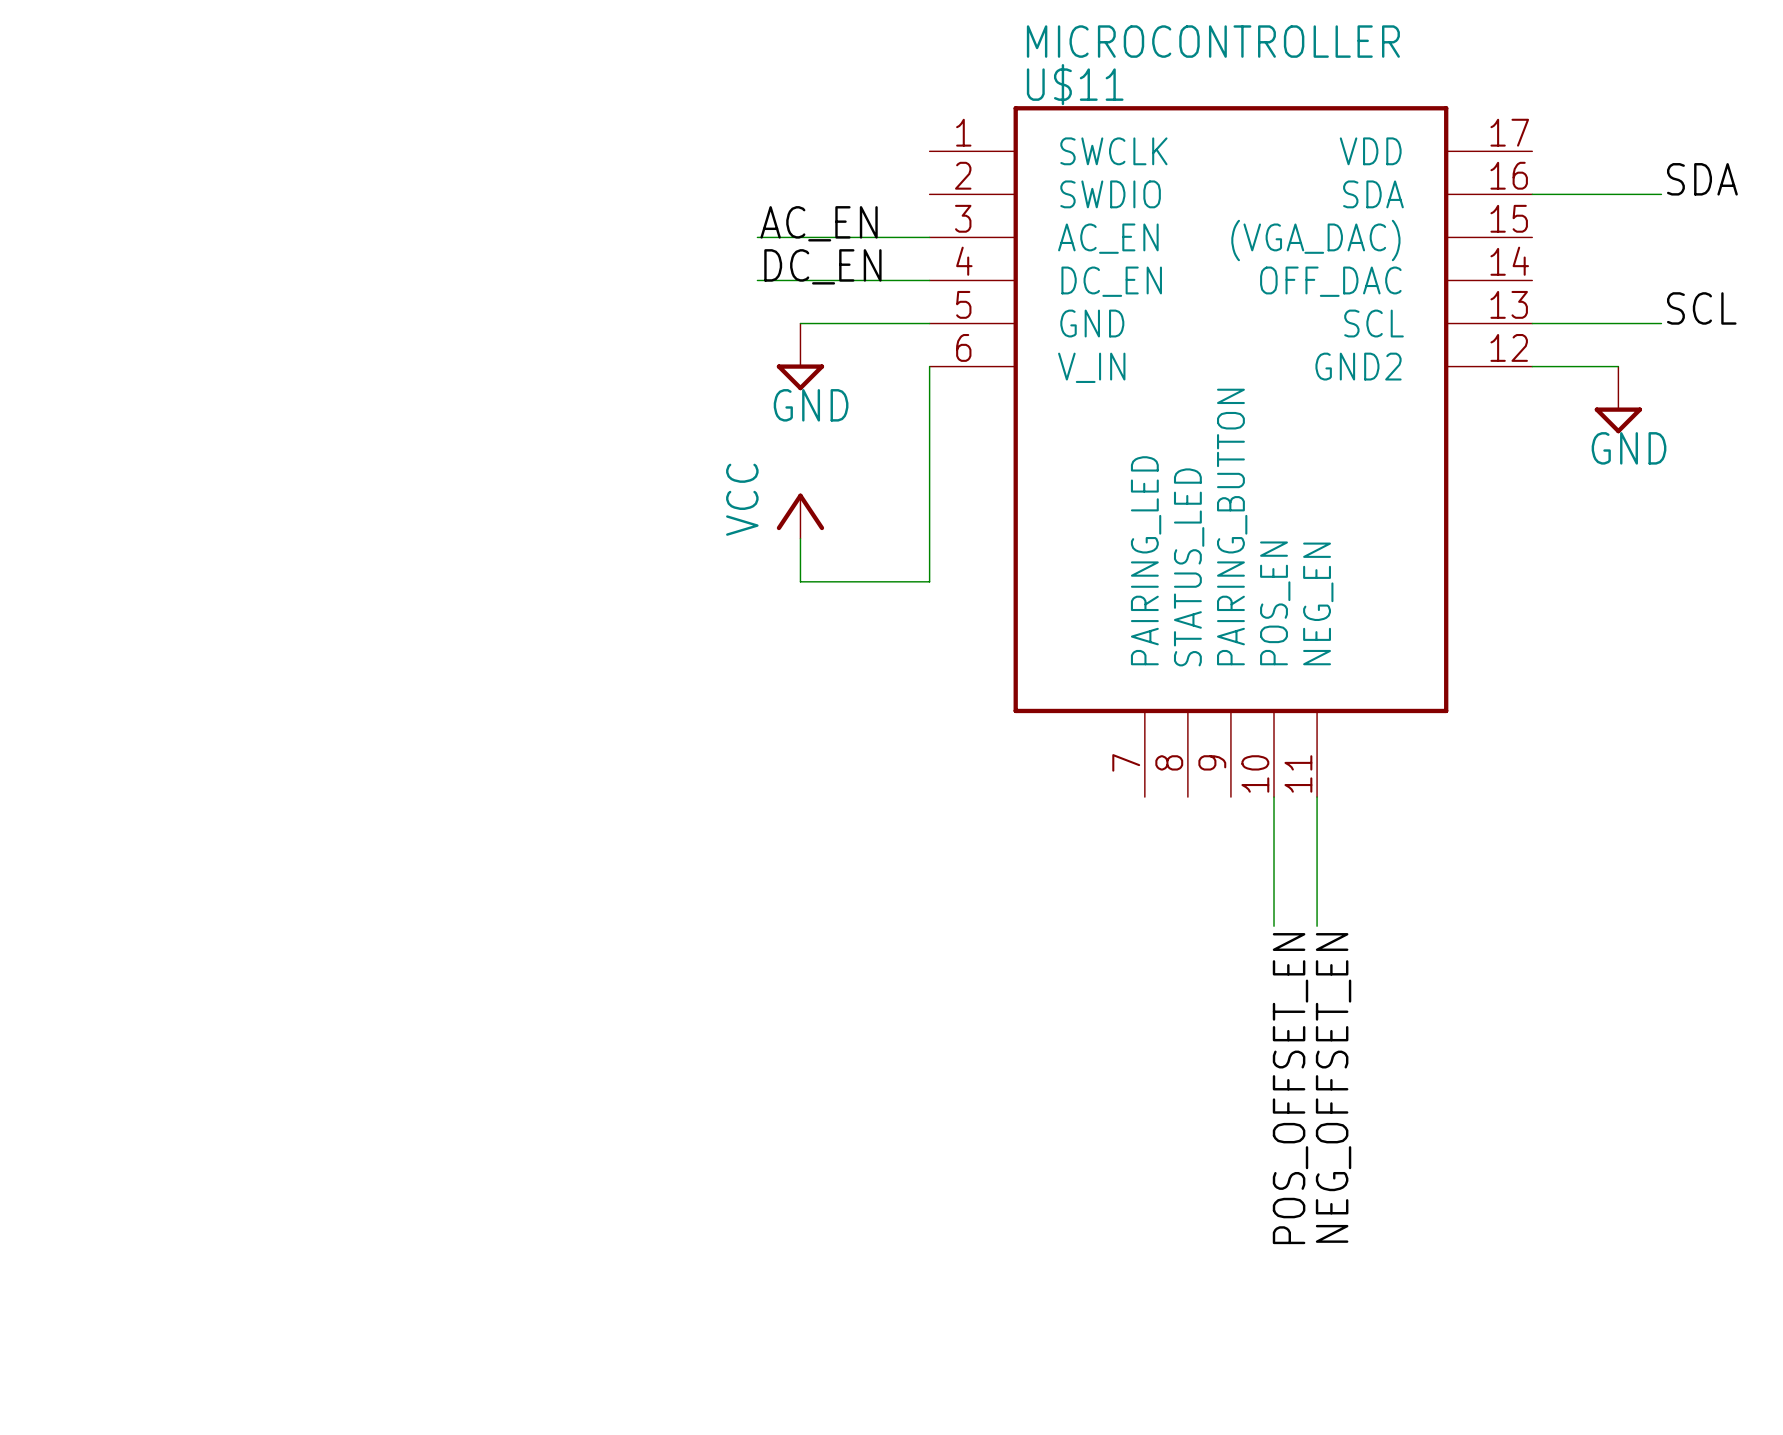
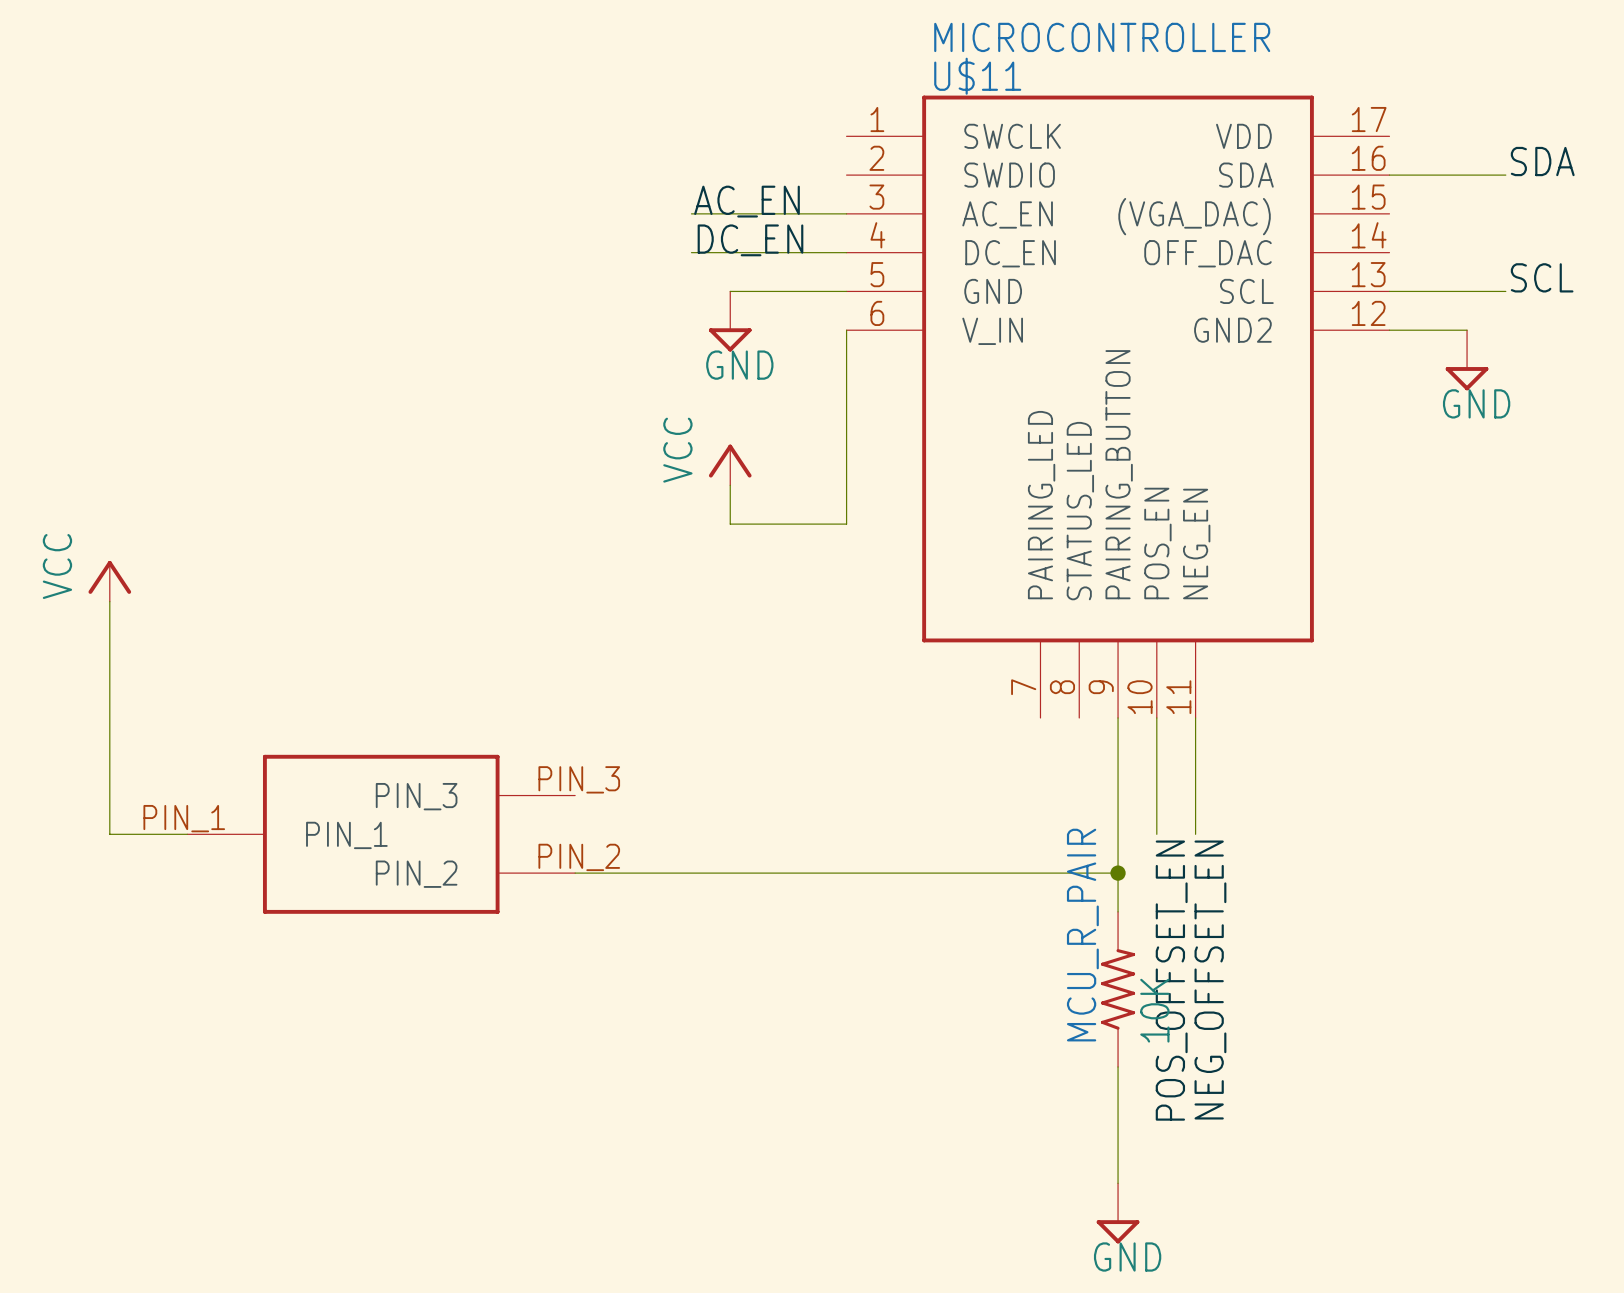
power symbol: none -> VCC (109, 581)
wire: none -> (109, 601) (109, 834) (187, 834)
wire: none -> (1118, 717) (1118, 911)
part: none -> (381, 834)
wire: none -> (575, 873) (1118, 873)
junction: none -> (1118, 873)
MCU_R_PAIR: none -> 10K (1118, 989)
wire: none -> (1118, 1066) (1118, 1183)
power symbol: none -> GND (1118, 1213)

